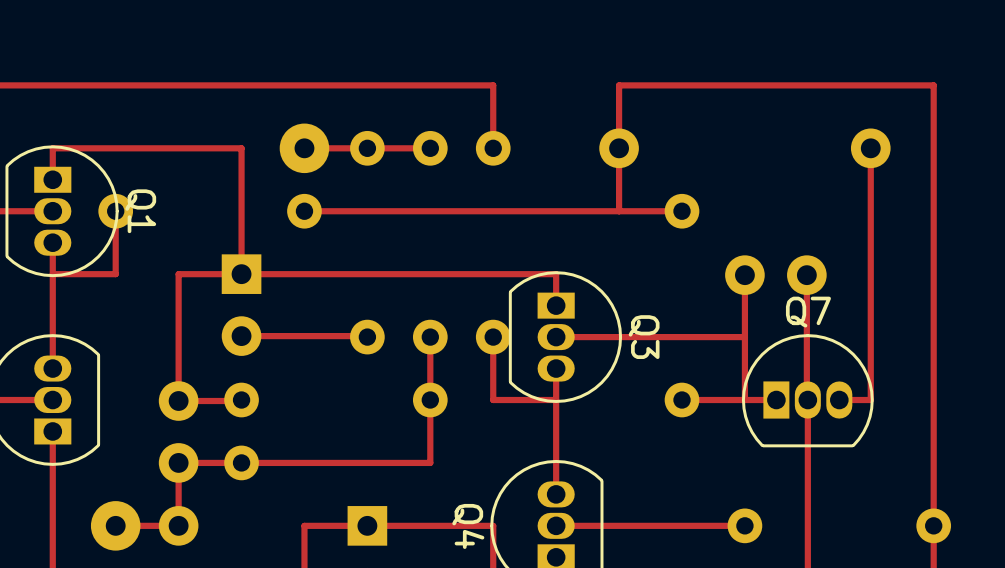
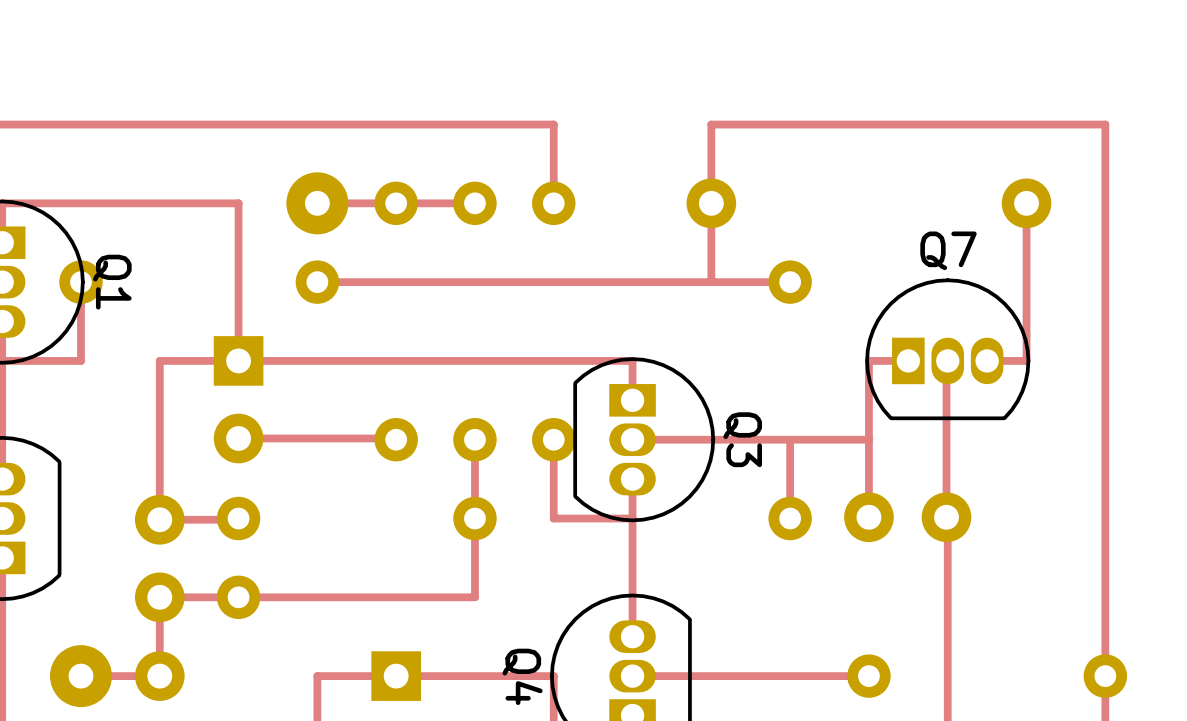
top track: none -> (908, 360) (868, 362)
top track: (870, 274) (870, 400) (839, 400) -> (1026, 360) (987, 360)
part position: (775, 275) -> (907, 517)
Q7 position: (807, 390) -> (947, 349)
top track: (776, 400) (682, 400) -> (790, 439) (790, 518)

